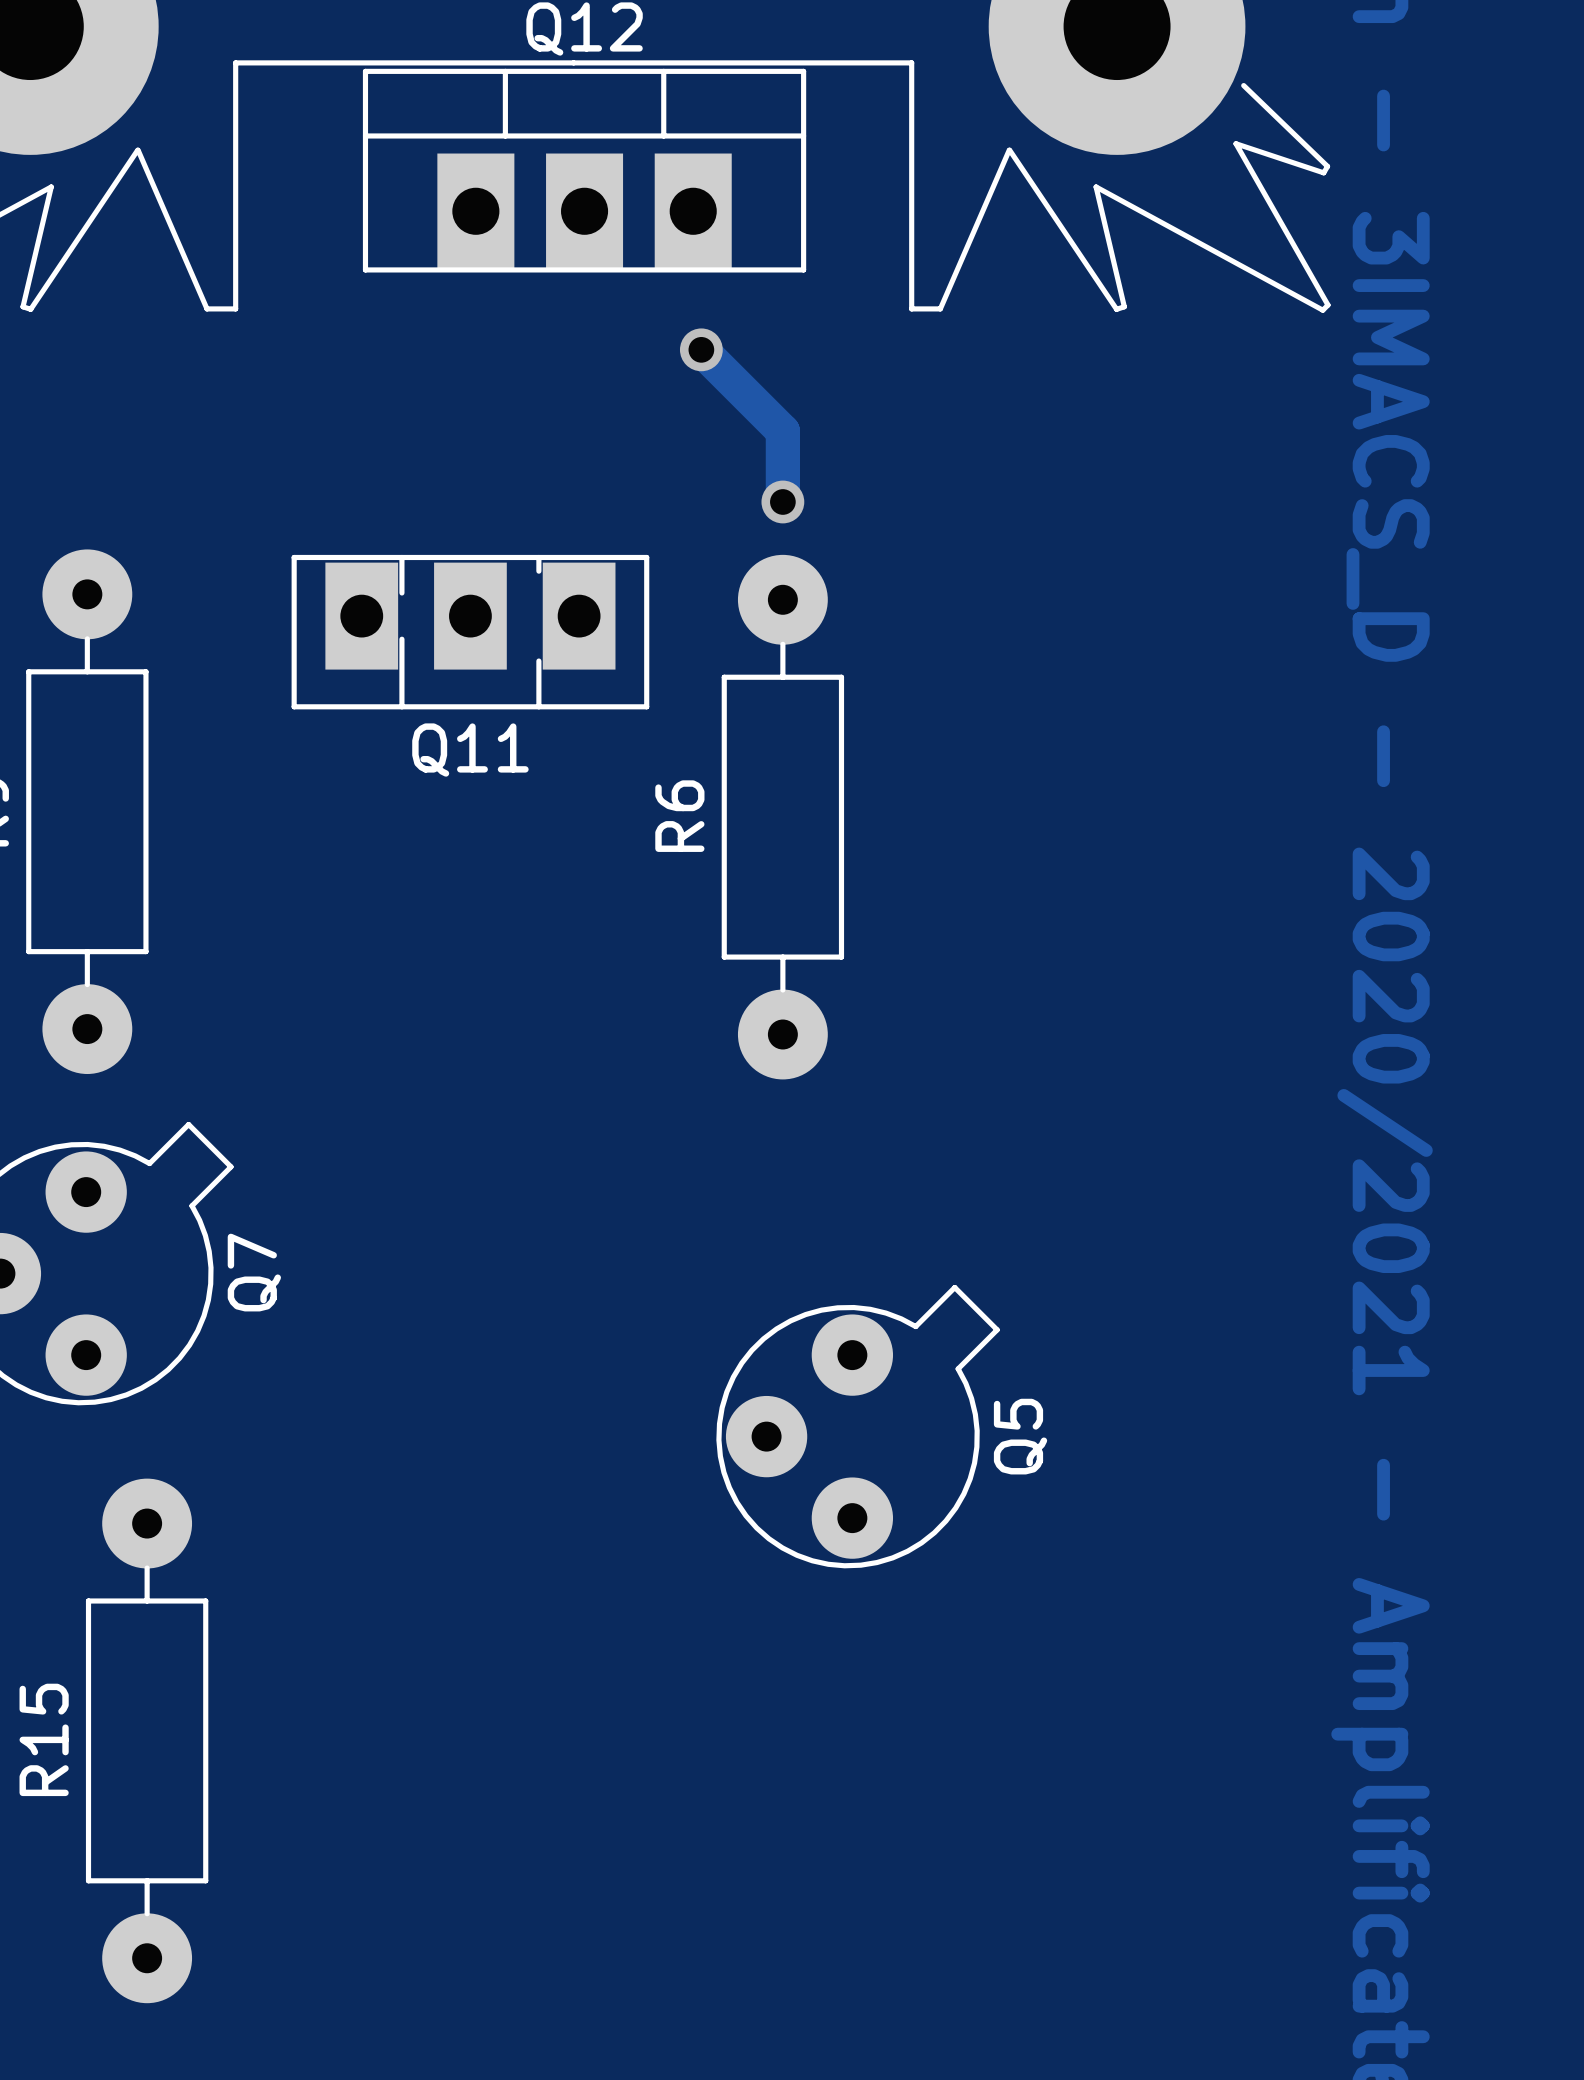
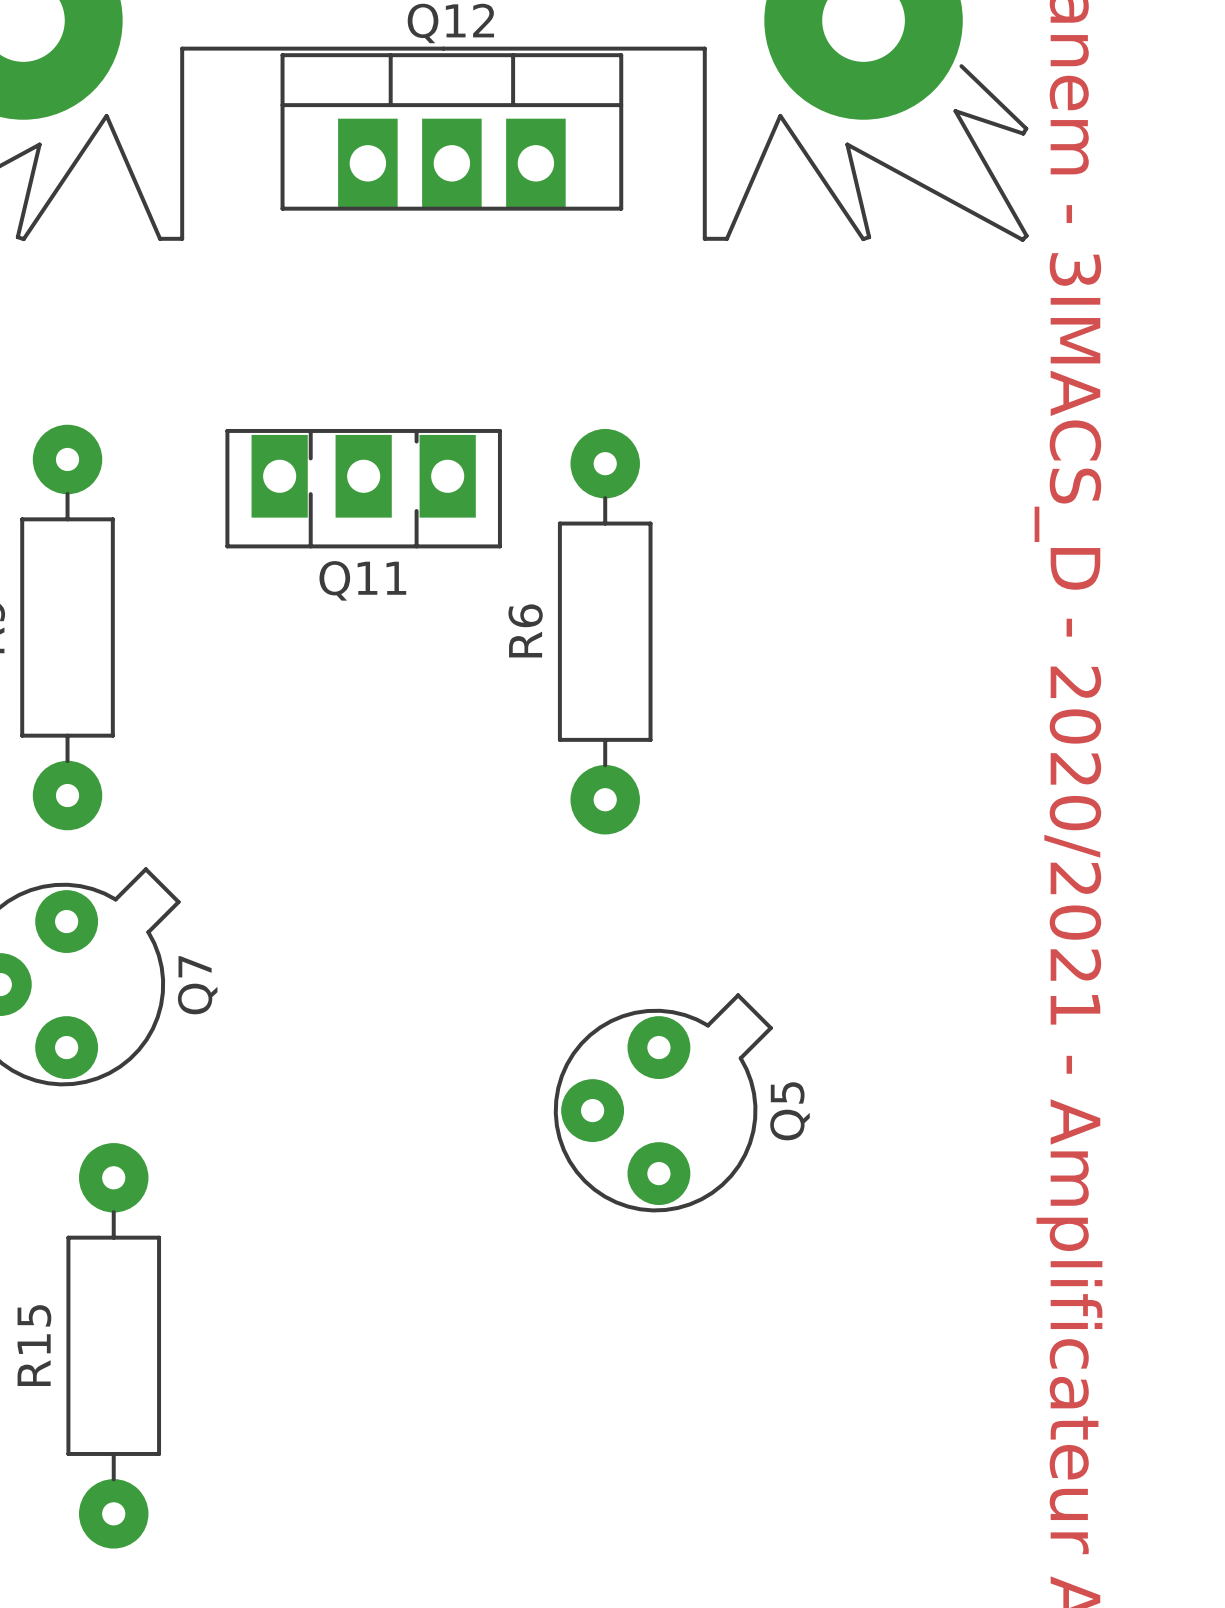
track: (701, 349) (782, 431) (782, 501) -> none
via: (701, 349) -> none
via: (782, 501) -> none

